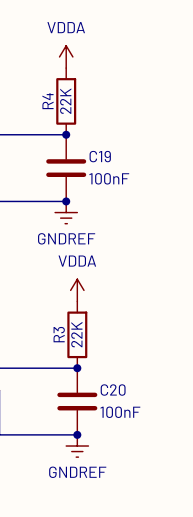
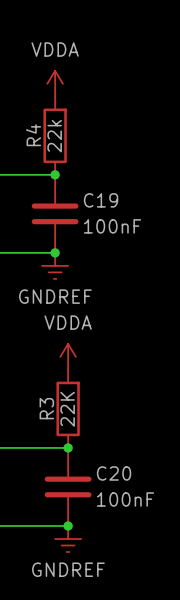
R4 value: 22K (65, 101) -> 22k (54, 136)

